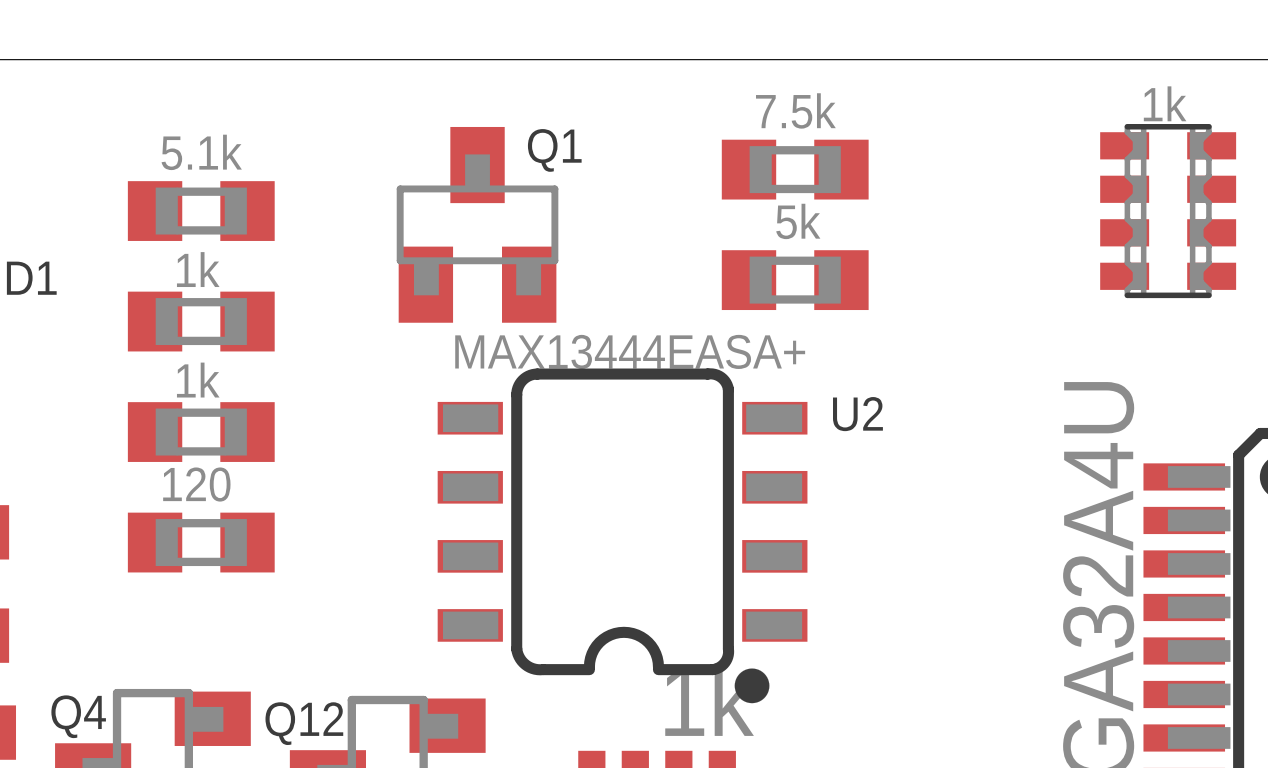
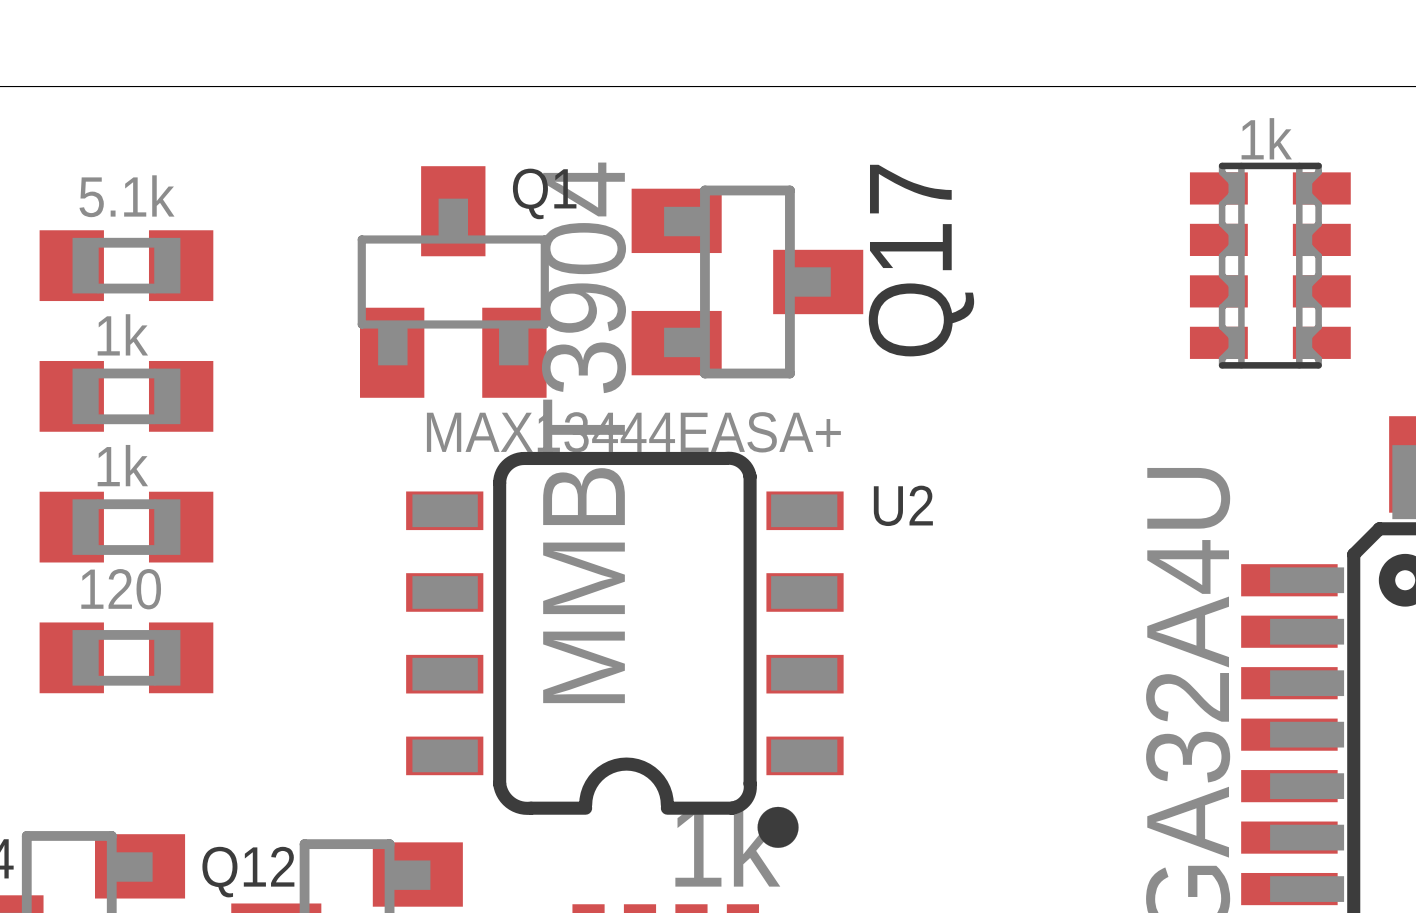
part: 7.5k (795, 169) -> none
Q17: none -> MMBT3904 (747, 281)
part: 5k (795, 280) -> none

